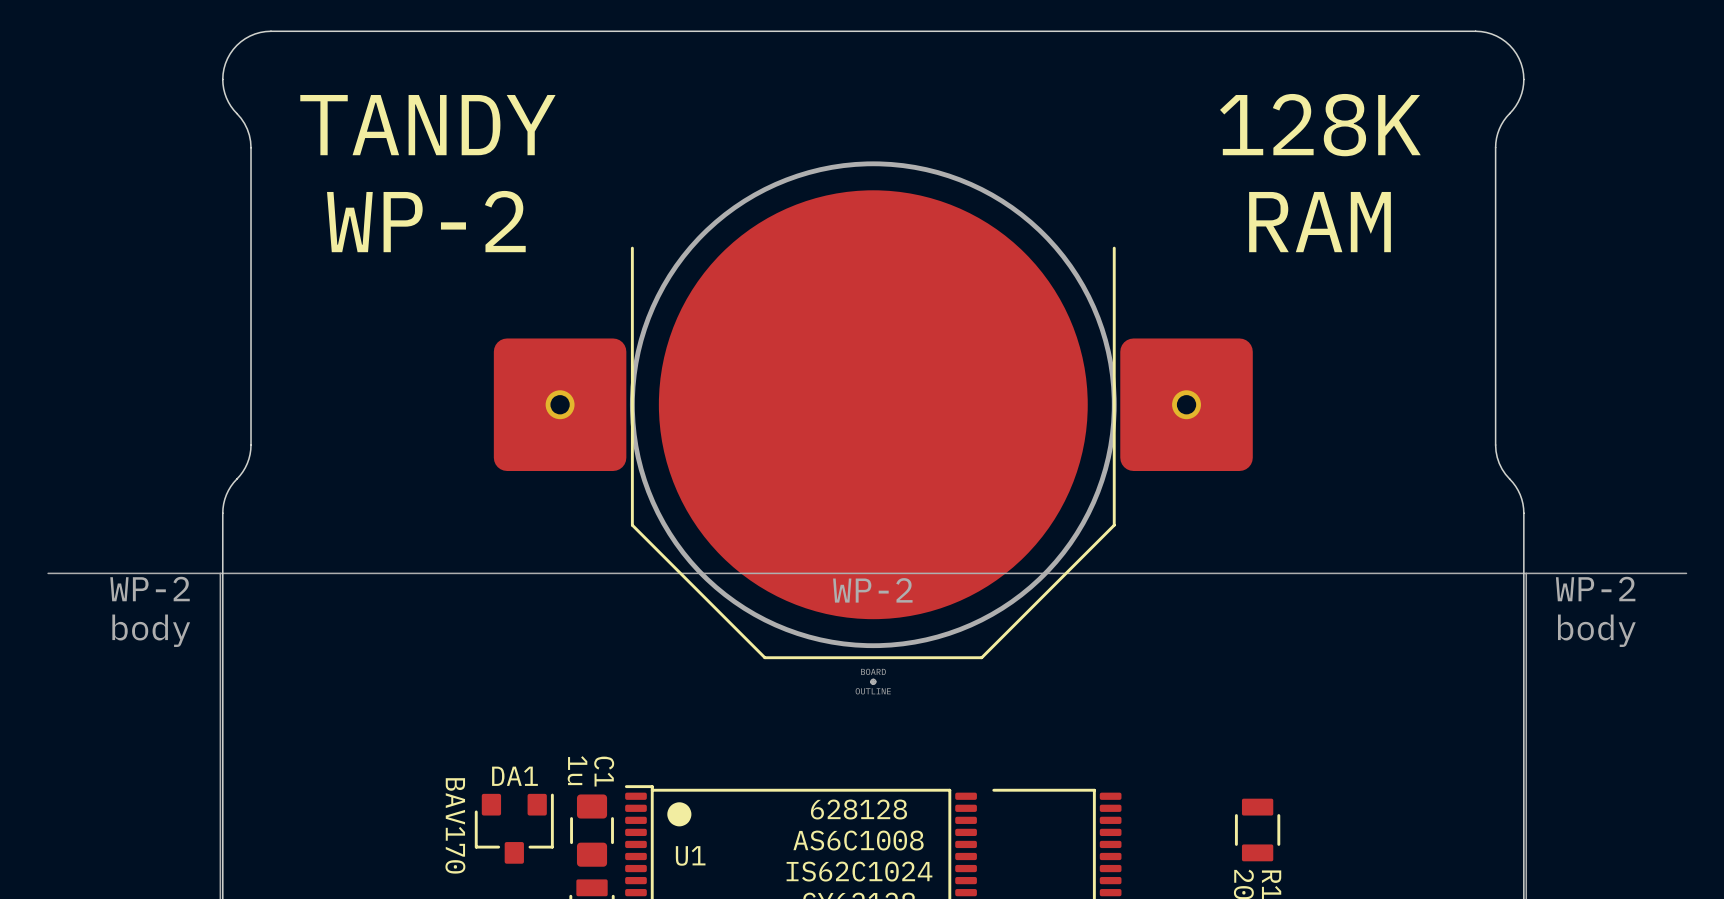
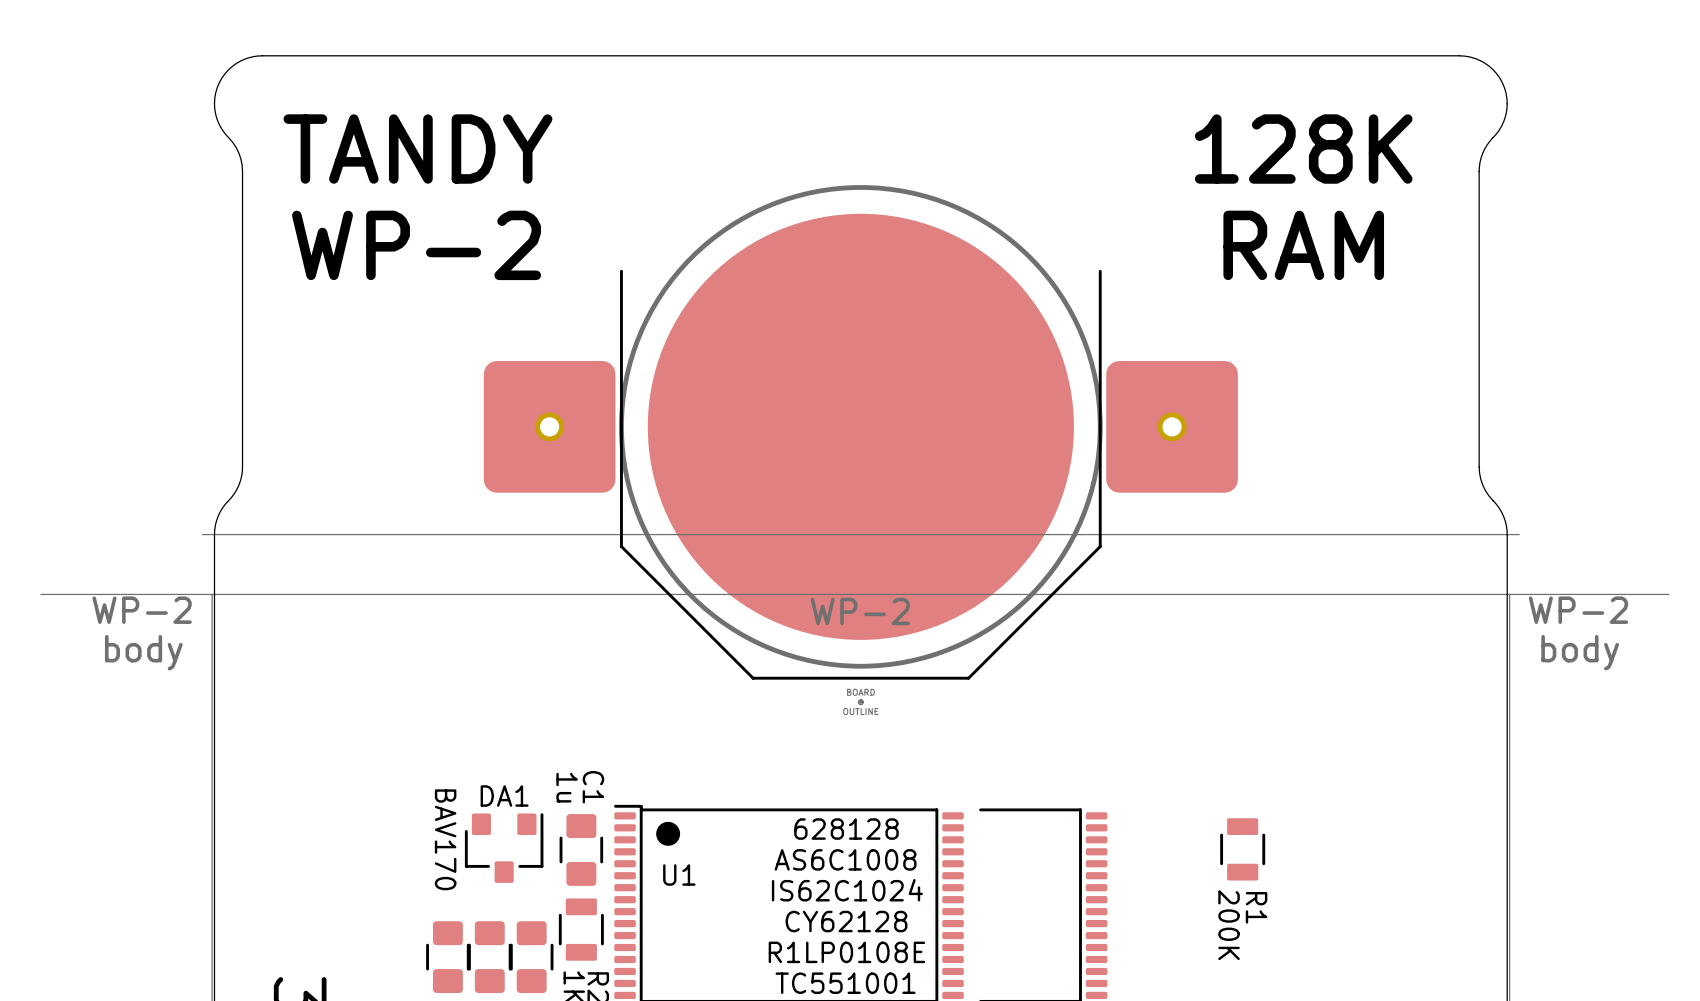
line: none -> (202, 534) (1519, 534)

